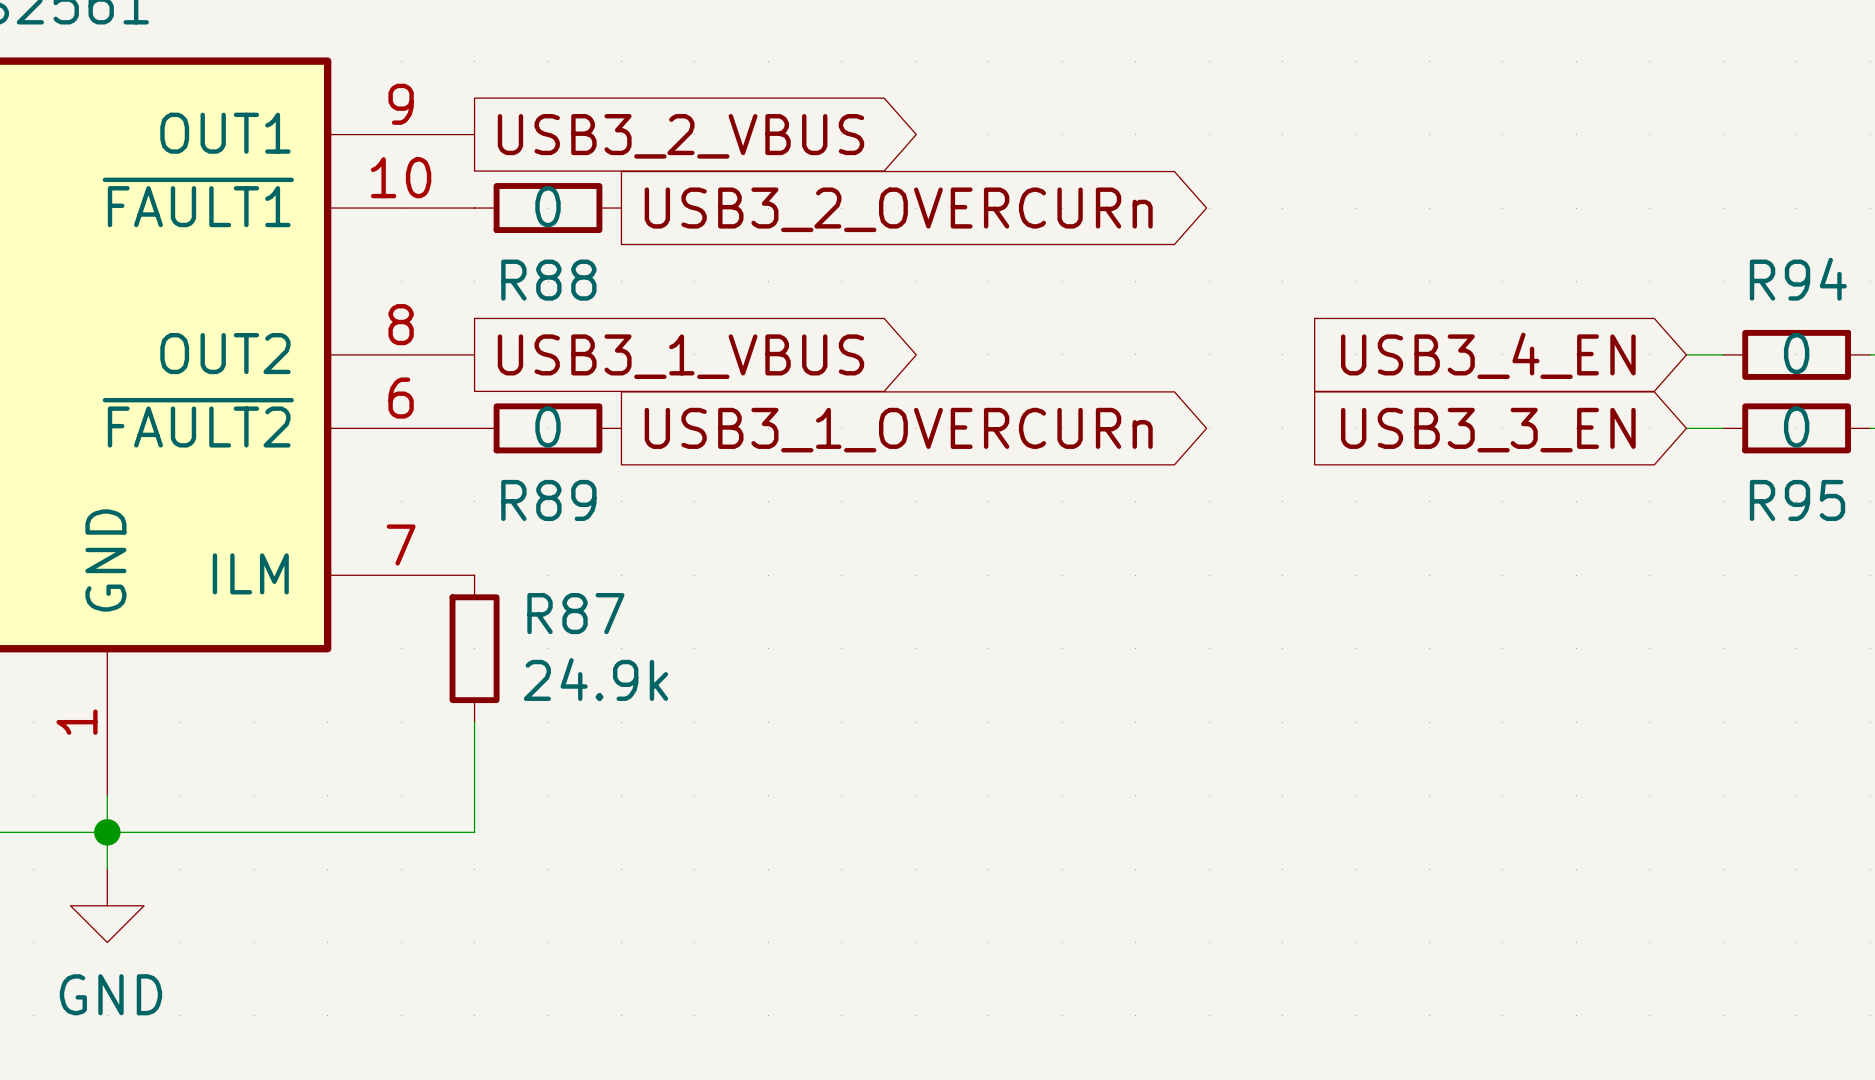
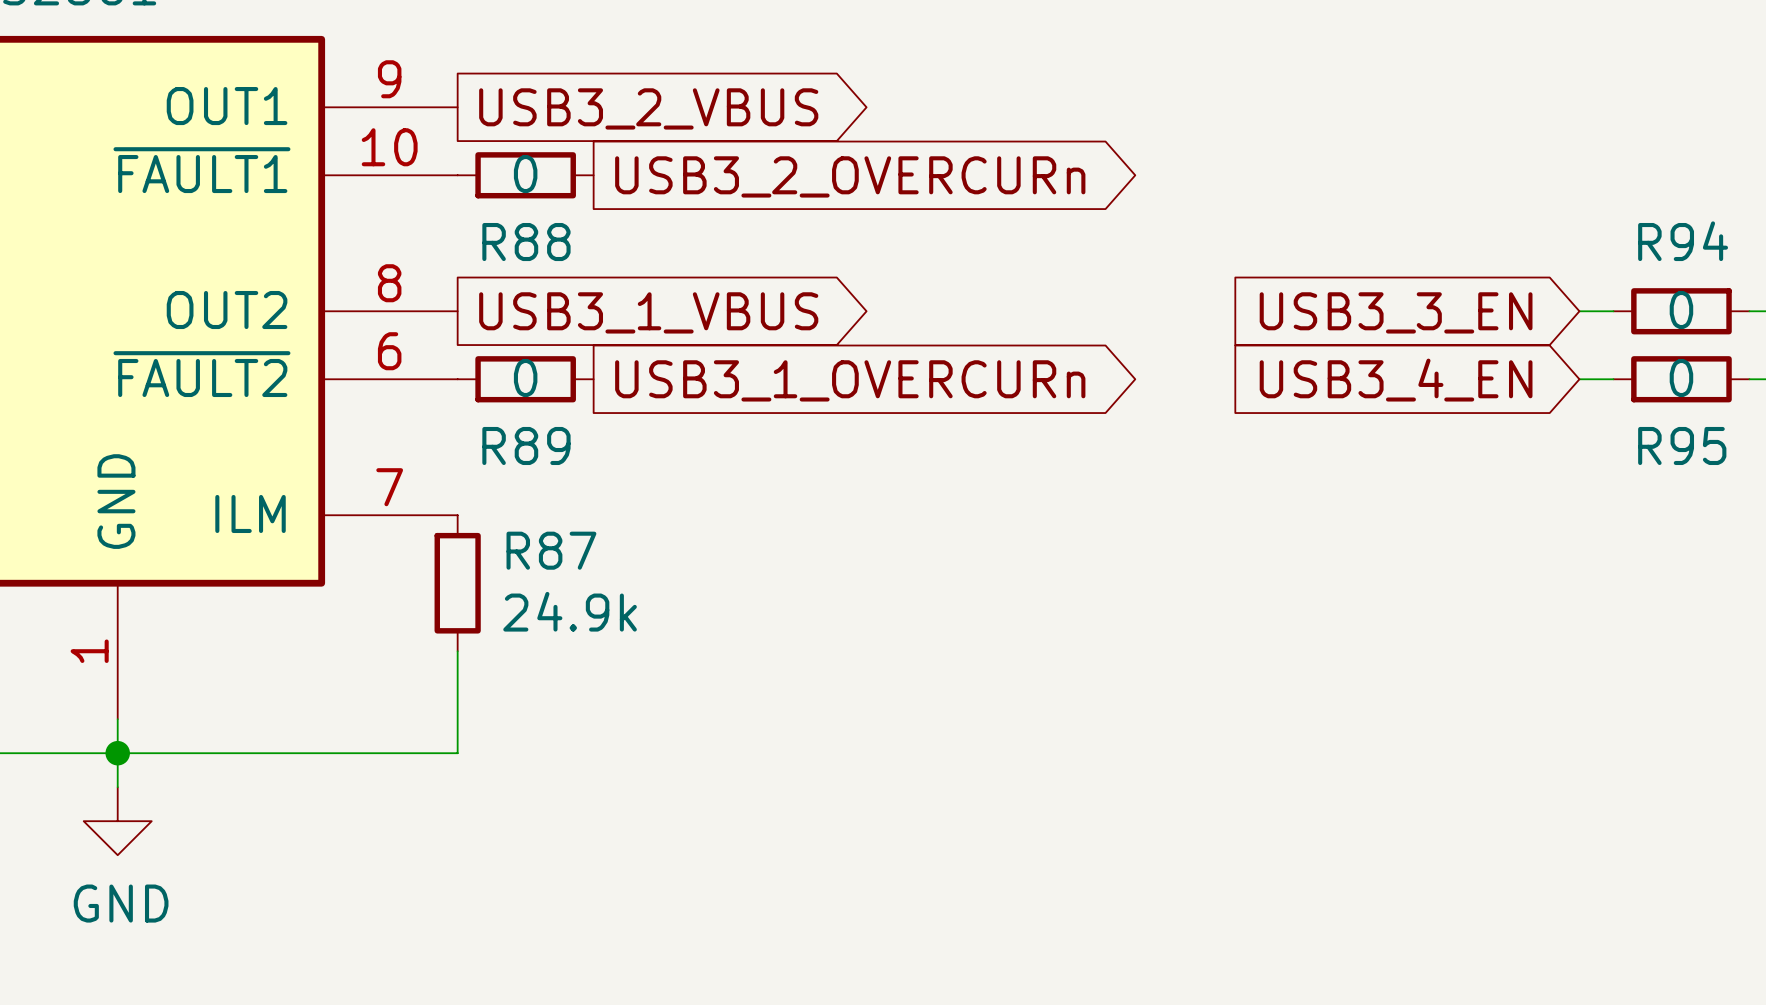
global label: USB3_4_EN (1488, 355) -> USB3_3_EN (1396, 312)
global label: USB3_3_EN (1488, 430) -> USB3_4_EN (1396, 380)

